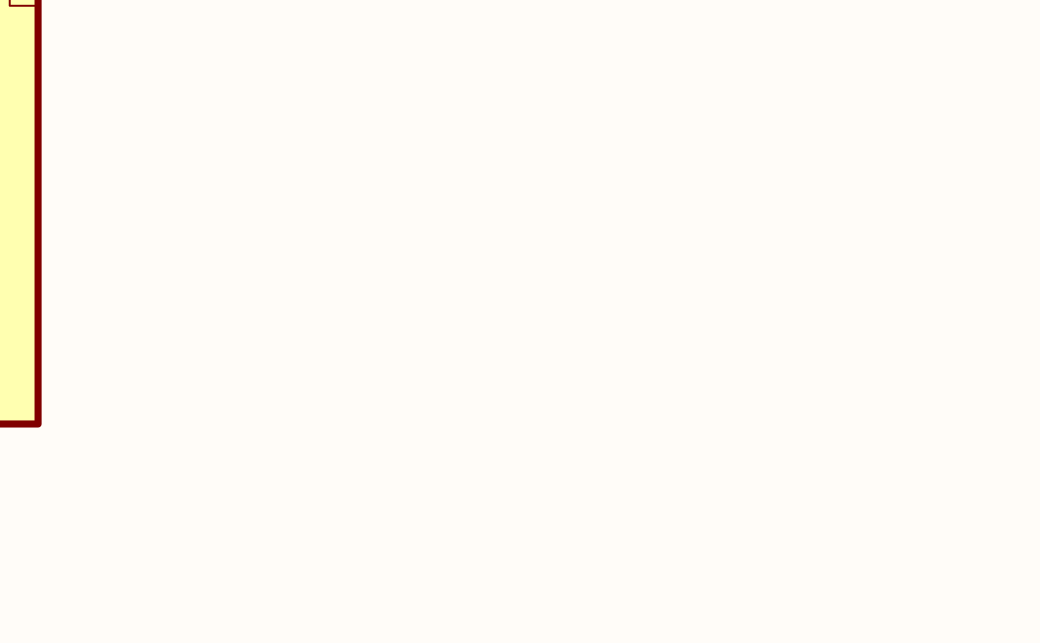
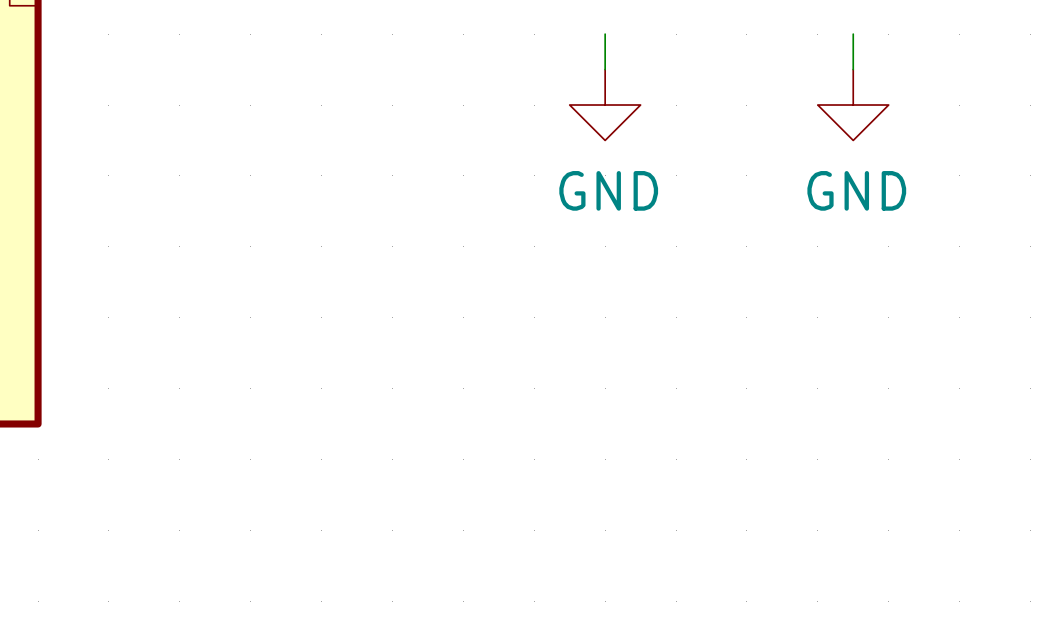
wire: none -> (605, 34) (605, 69)
wire: none -> (853, 34) (853, 69)
power symbol: none -> GND (605, 105)
power symbol: none -> GND (853, 105)

